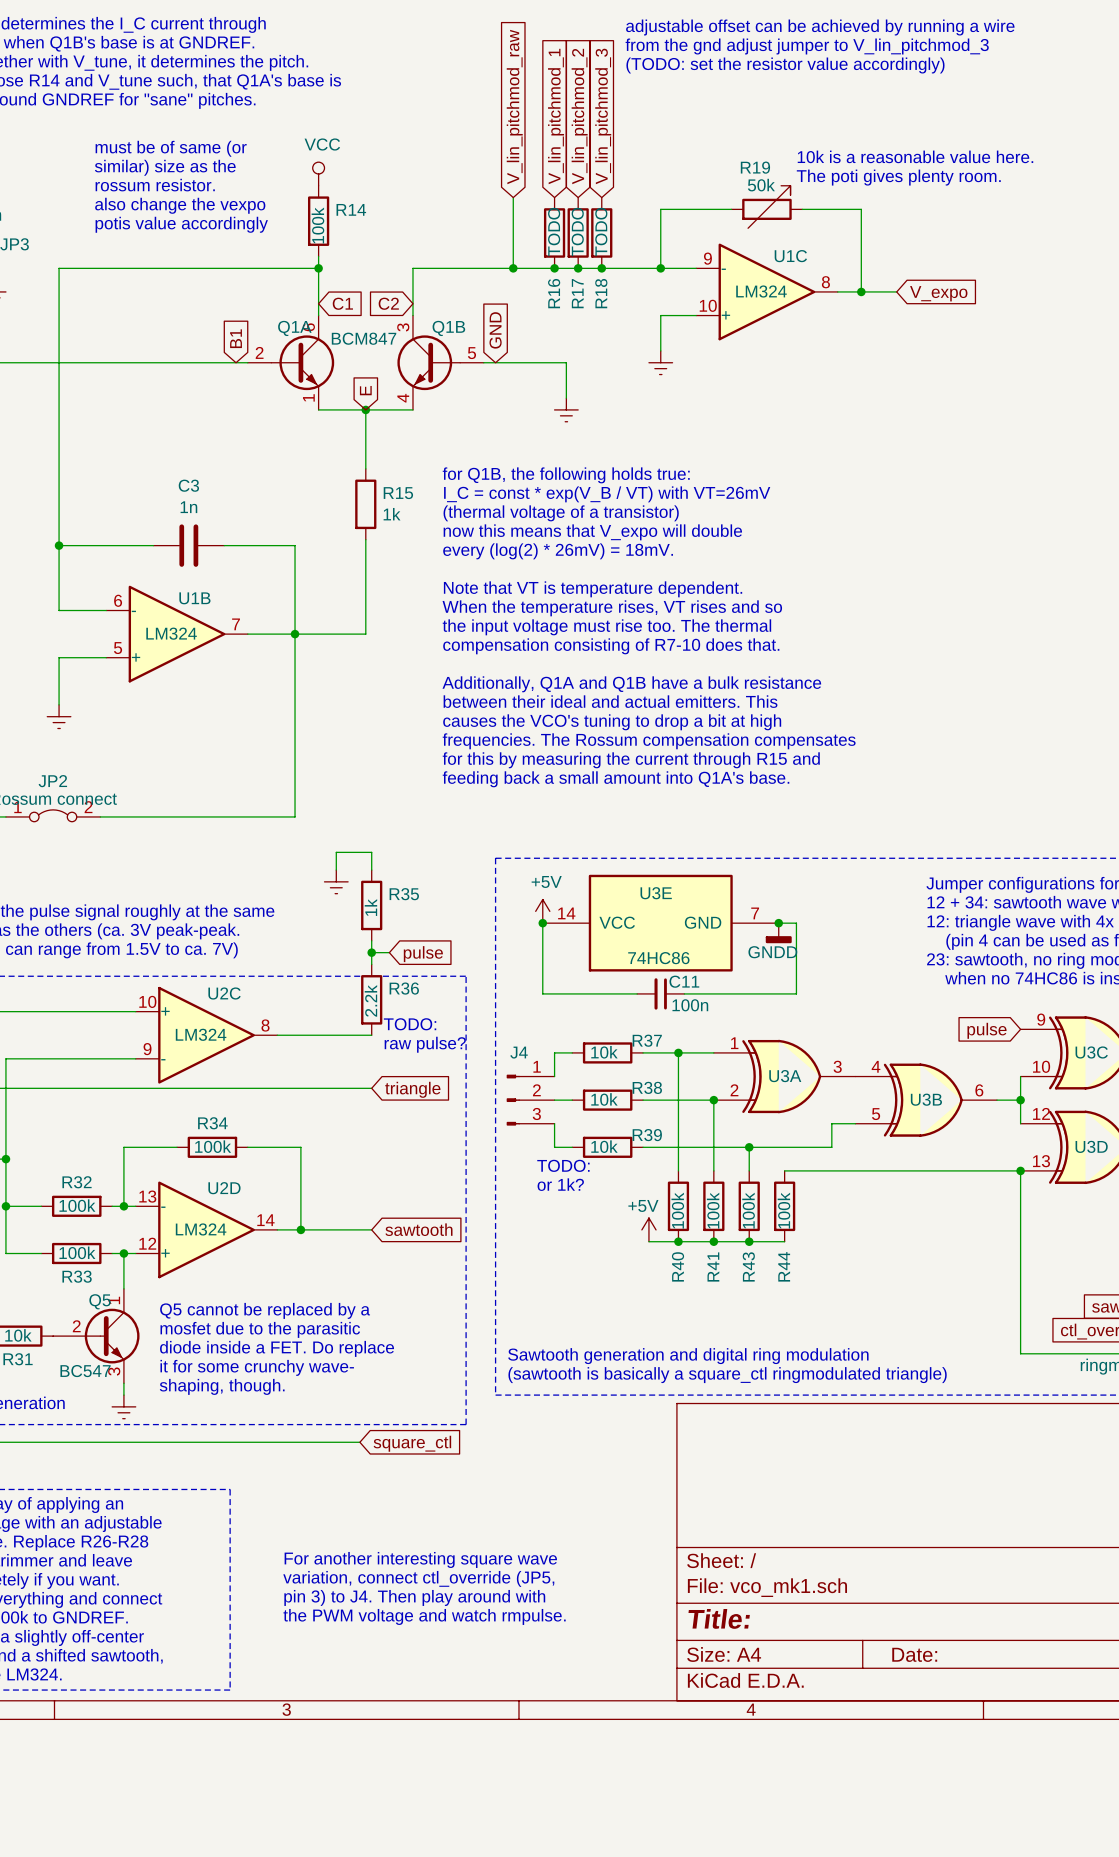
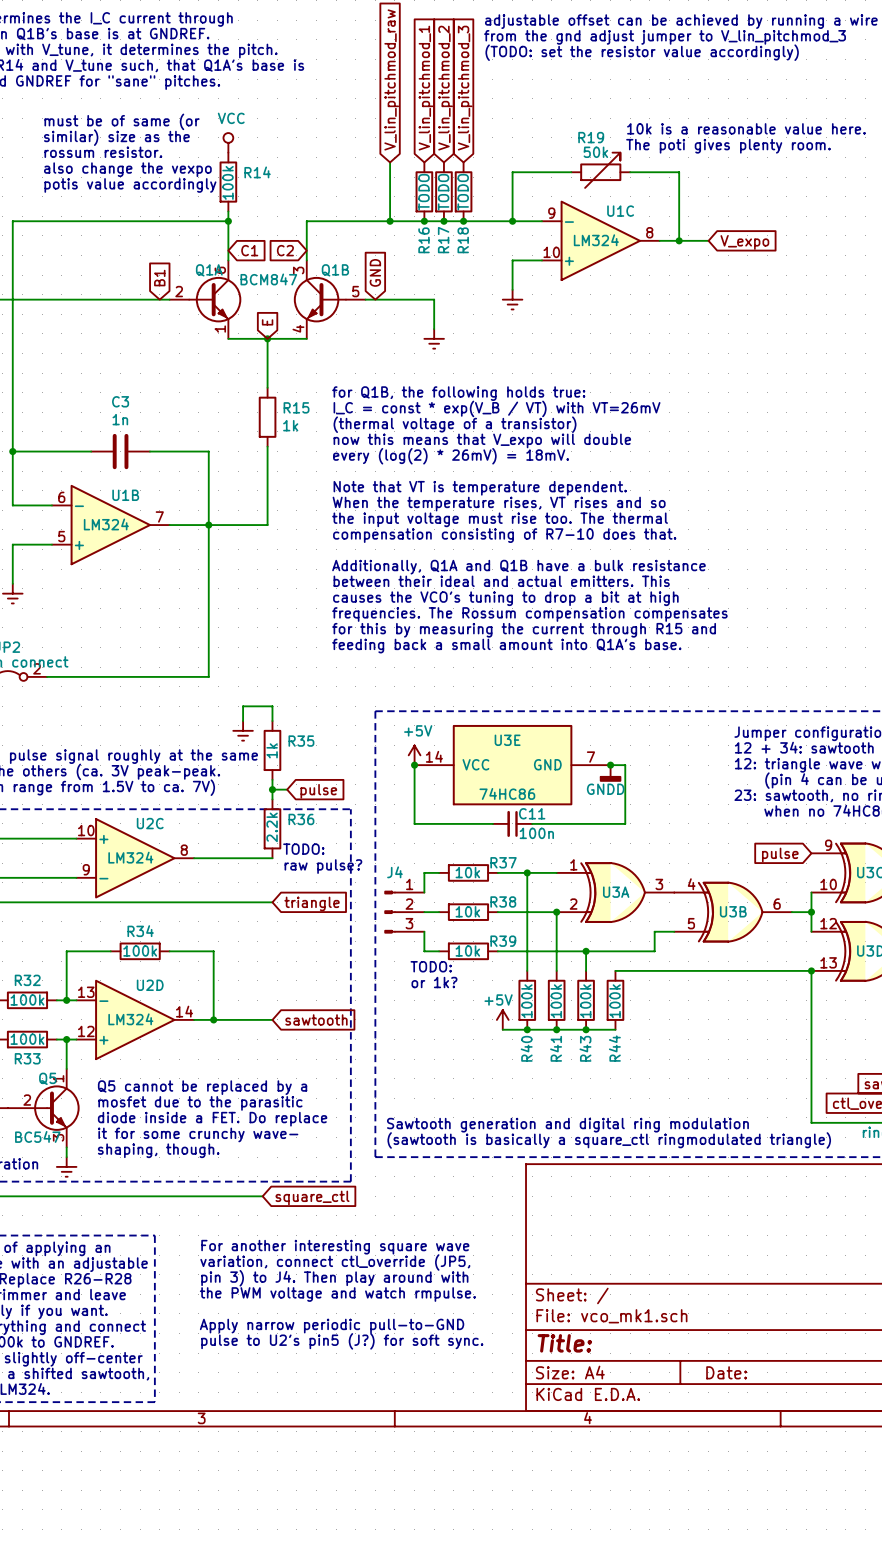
text: none -> For another interesting square wave (335, 1247)
text: none -> pin 3) to J4. Then play around with (334, 1278)
text: For another interesting square wave (420, 1559) -> the PWM voltage and watch rmpulse. (337, 1294)
text position: variation, connect ctl_override (JP5, (418, 1578) -> variation, connect ctl_override (JP5, (335, 1262)
text: pin 3) to J4. Then play around with (414, 1597) -> Apply narrow periodic pull-to-GND (332, 1326)
text: the PWM voltage and watch rmpulse. (424, 1616) -> pulse to U2's pin5 (J?) for soft sync. (342, 1341)

